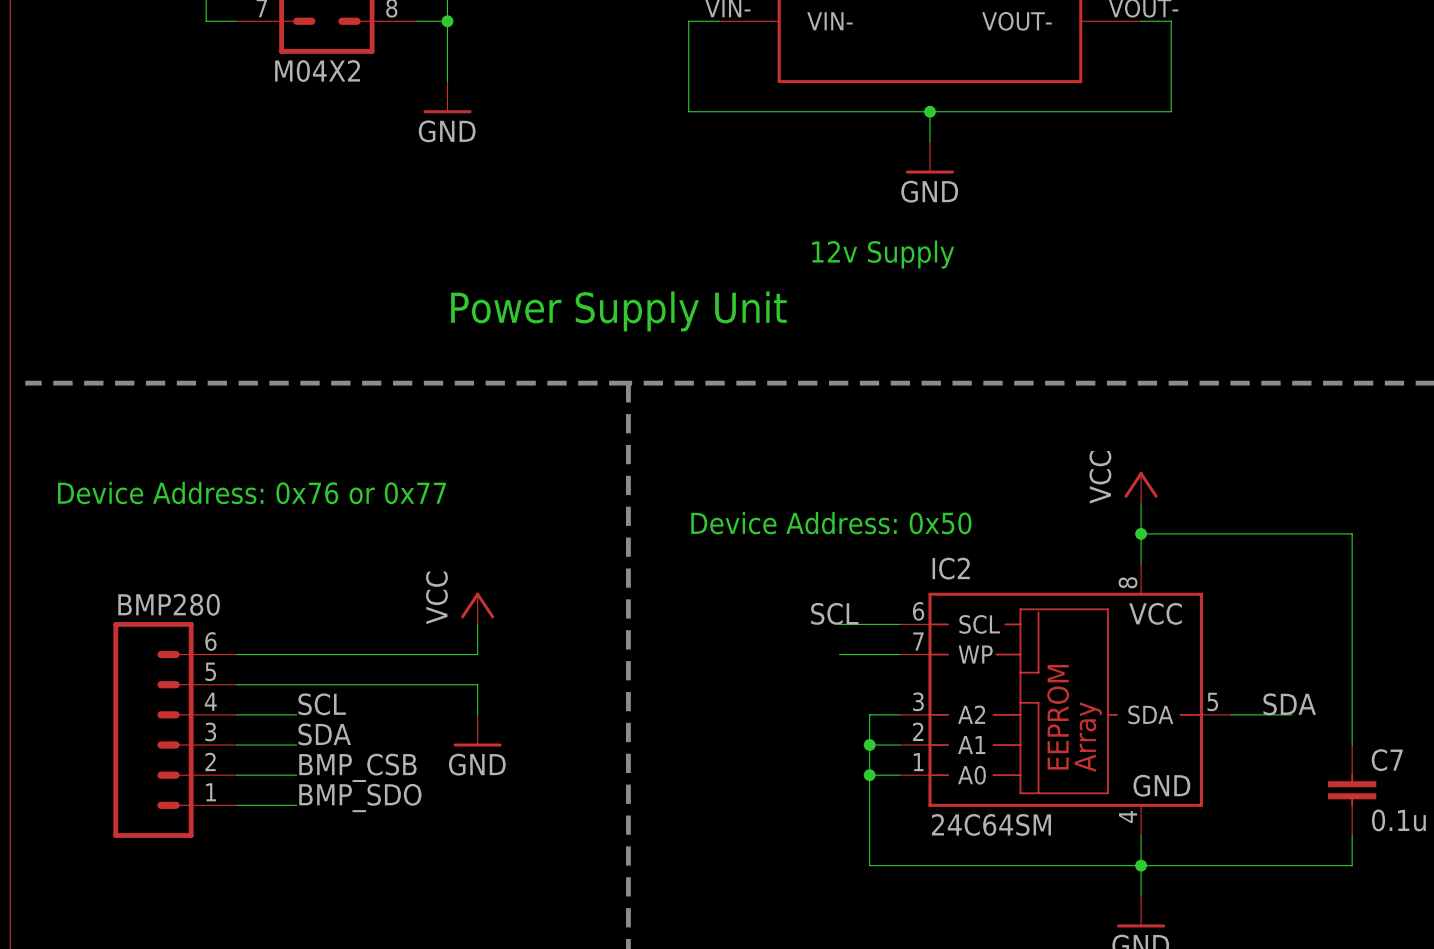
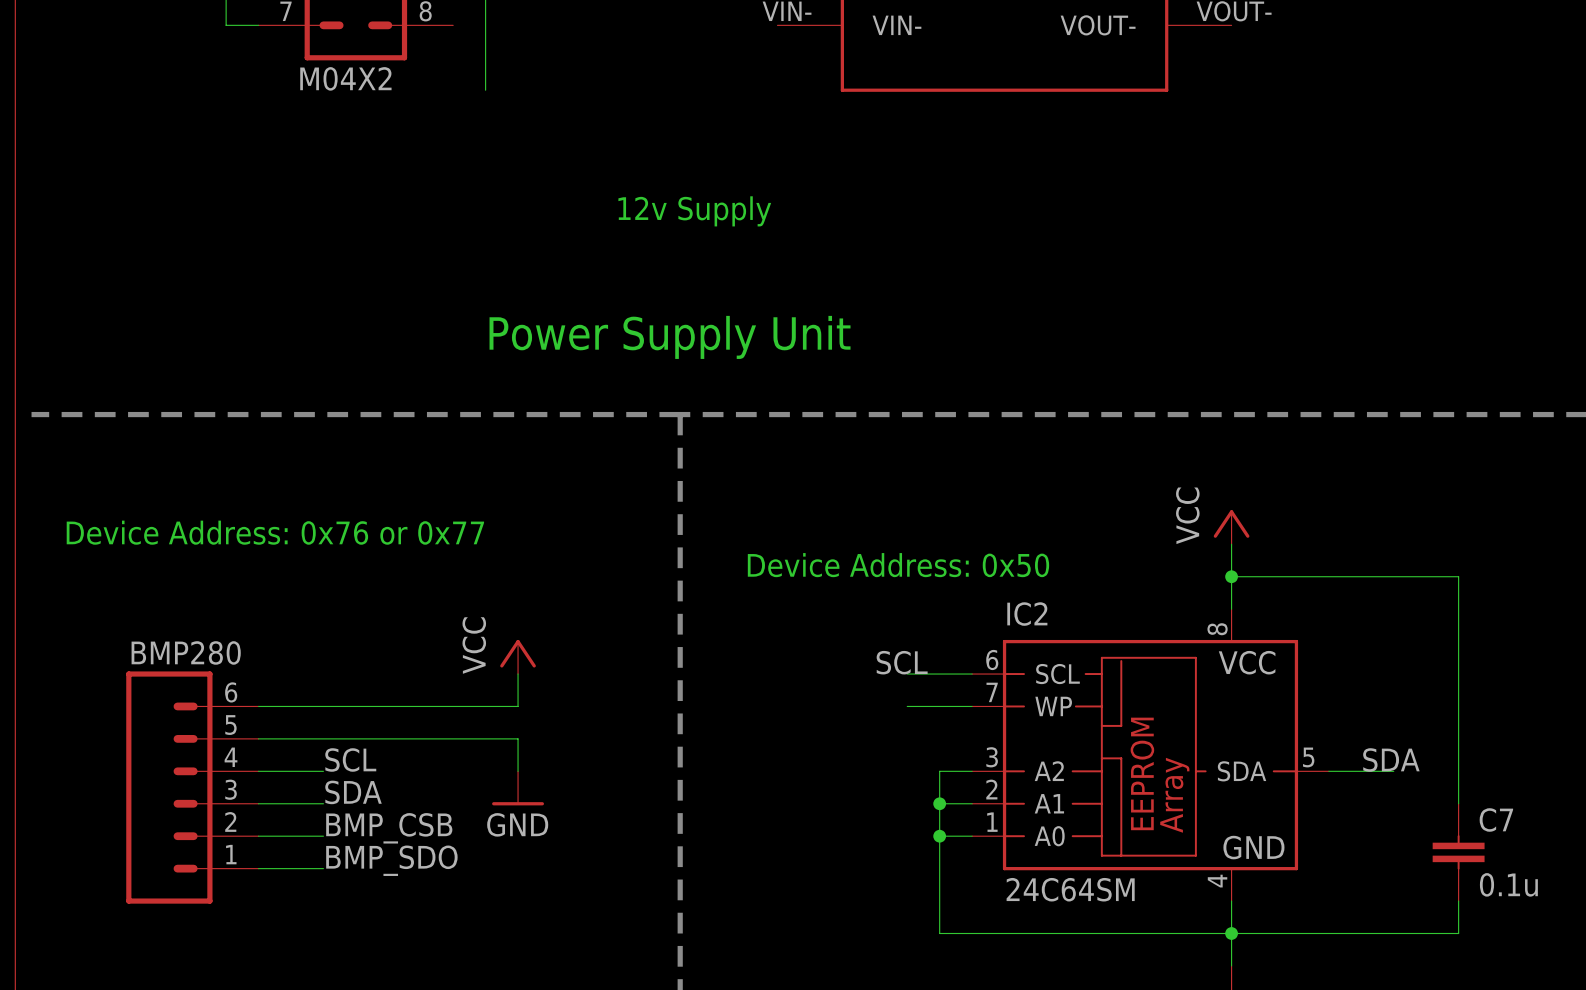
wire: (417, 21) (447, 21) -> none
junction: (447, 21) -> none
wire: (718, 21) (688, 21) (688, 111) (1171, 111) (1171, 21) (1141, 21) -> none
power symbol: GND (447, 97) -> none
wire: (929, 111) (929, 141) -> none
junction: (929, 111) -> none
power symbol: GND (929, 157) -> none
text position: 12v Supply (883, 254) -> 12v Supply (694, 211)

